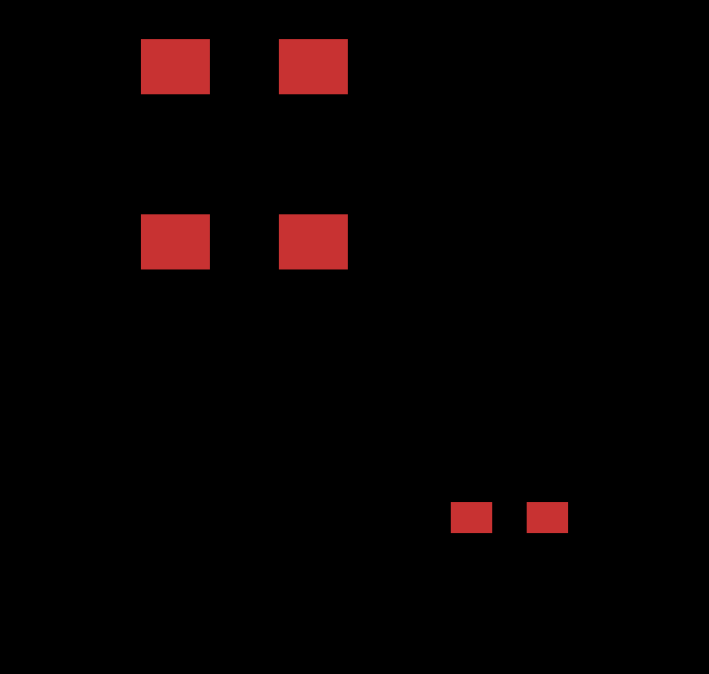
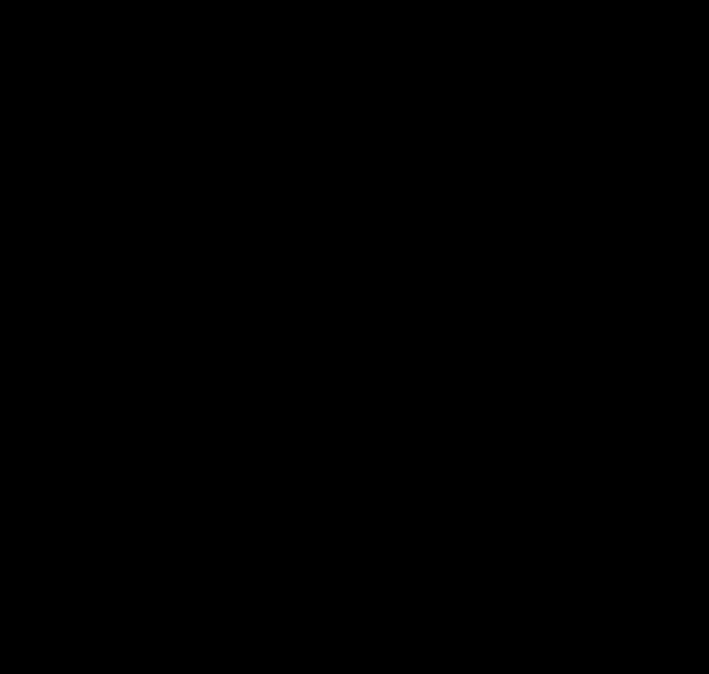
part: (244, 66) -> none
part: (244, 241) -> none
part: (509, 517) -> none

